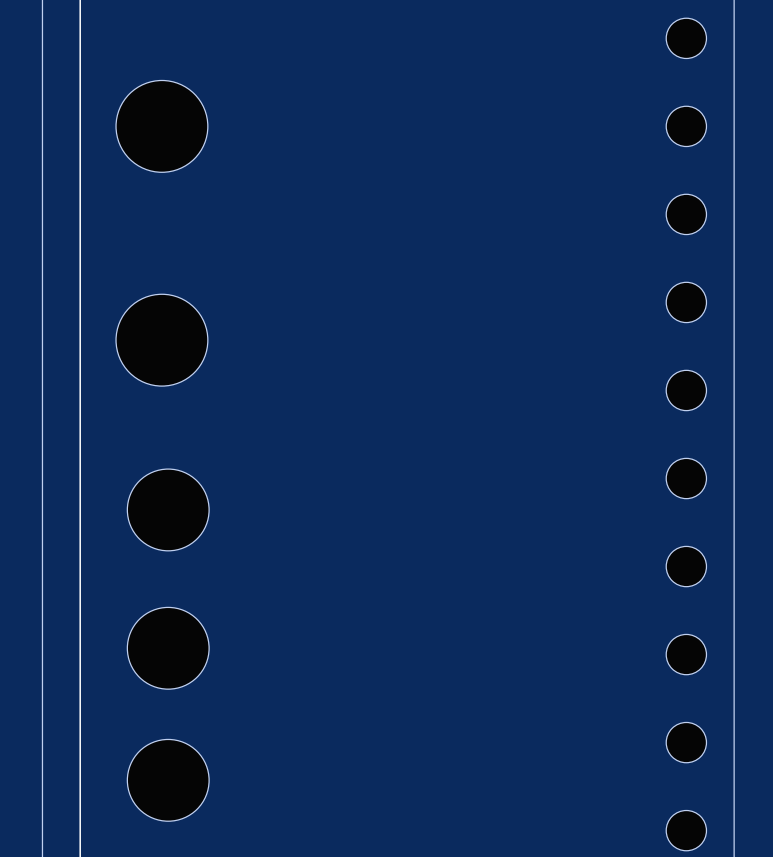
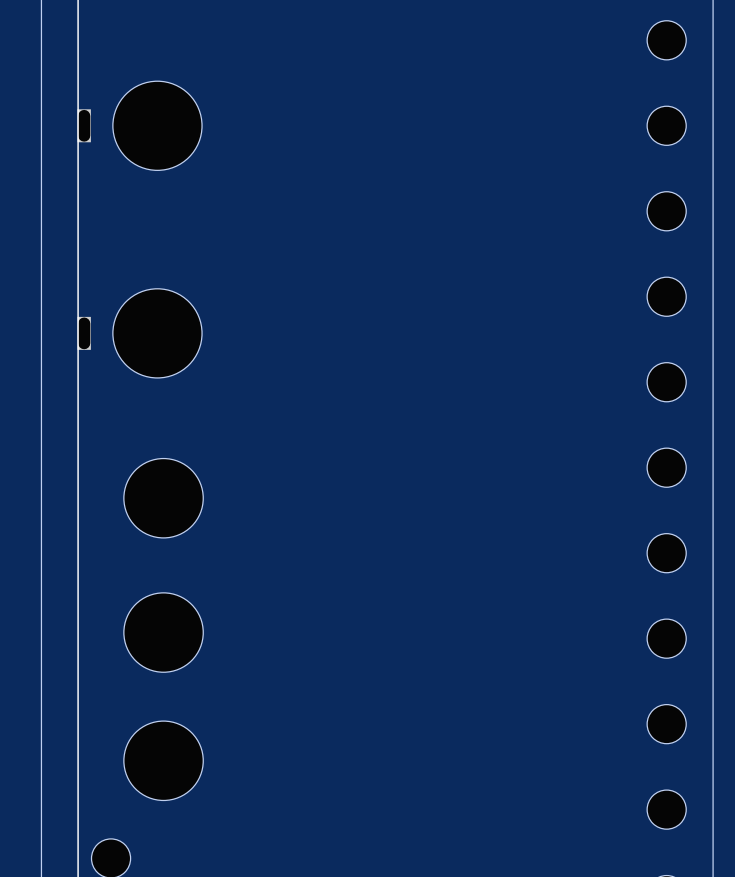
part: none -> (139, 125)
part: none -> (139, 333)

